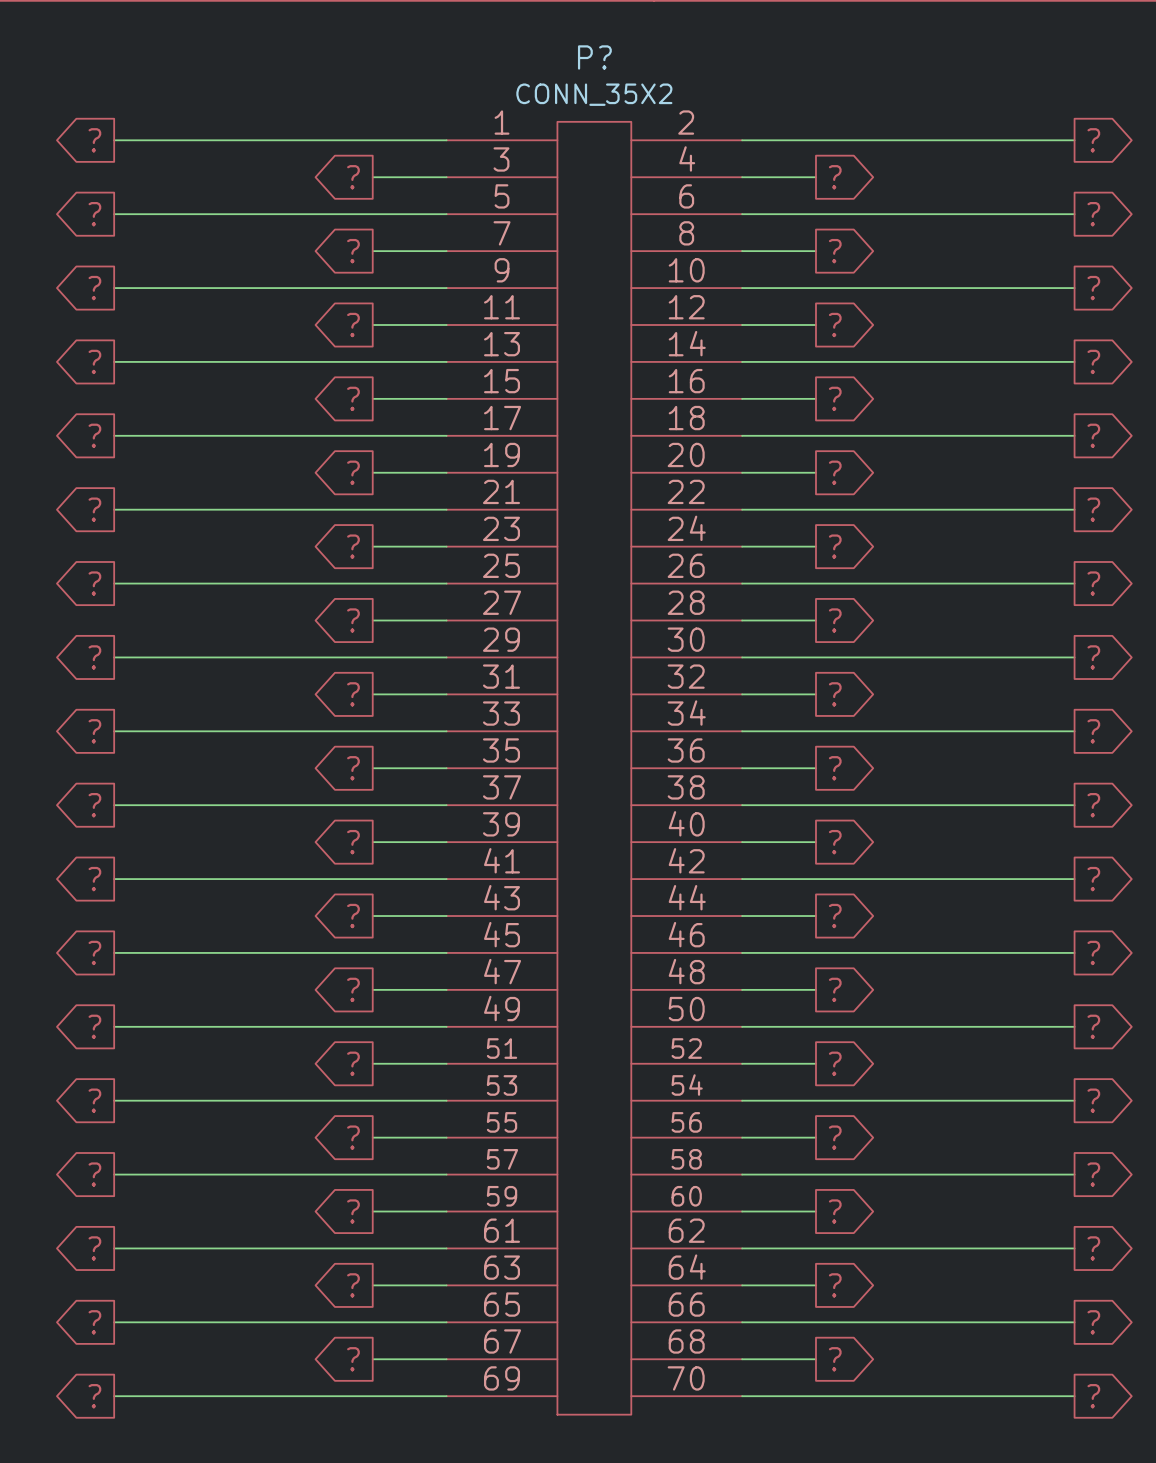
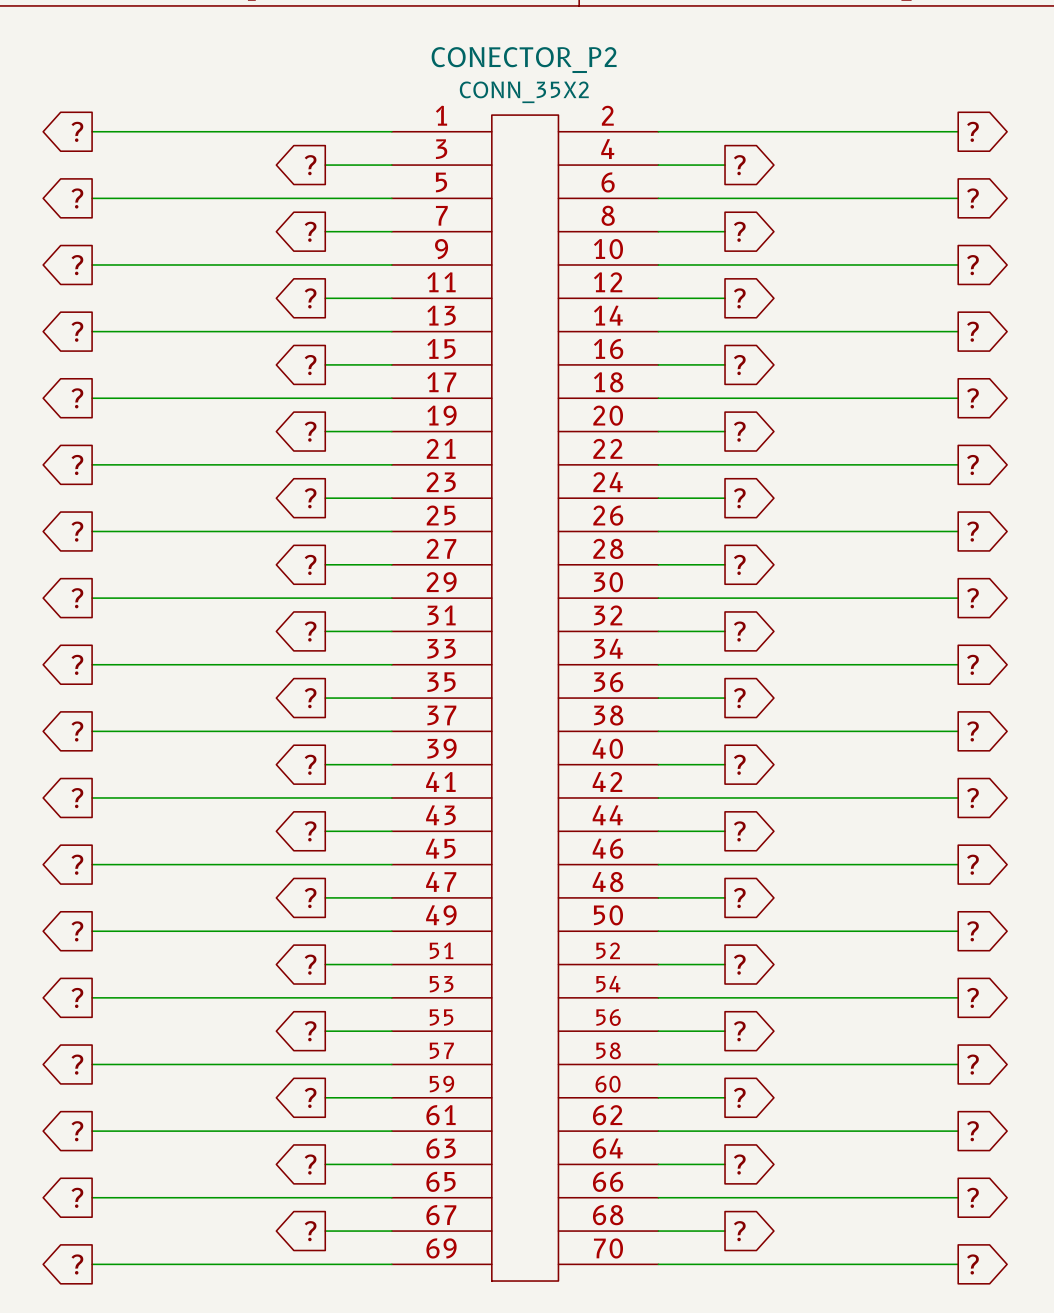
P? name: P? (594, 57) -> CONECTOR_P2 (524, 60)

